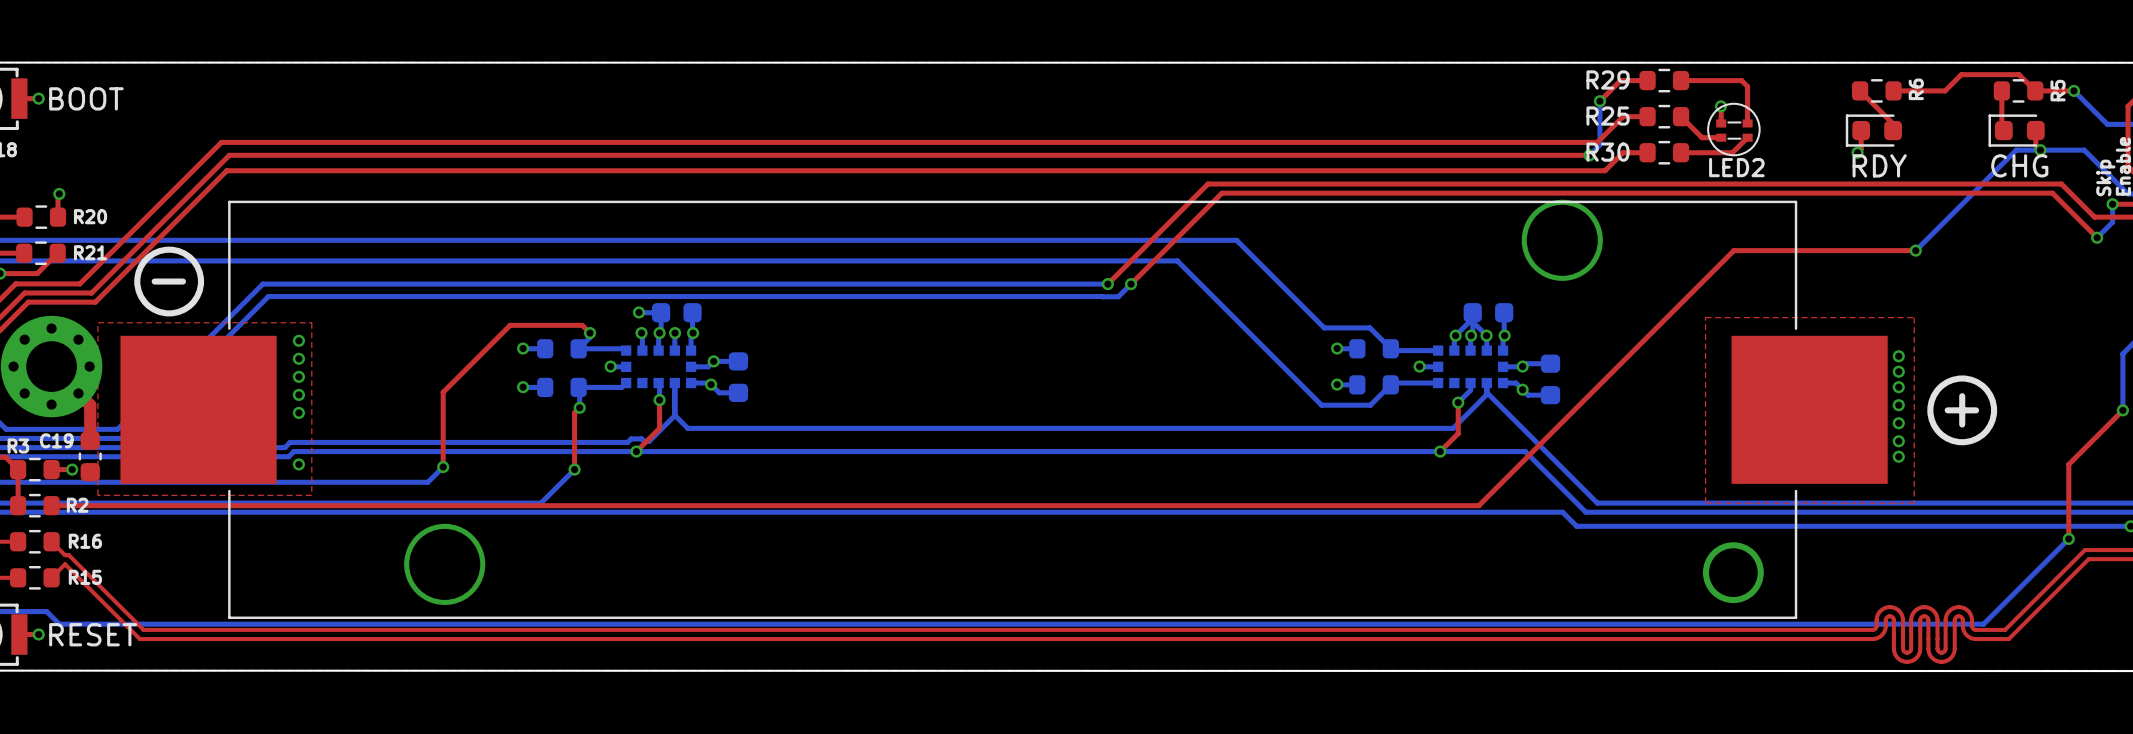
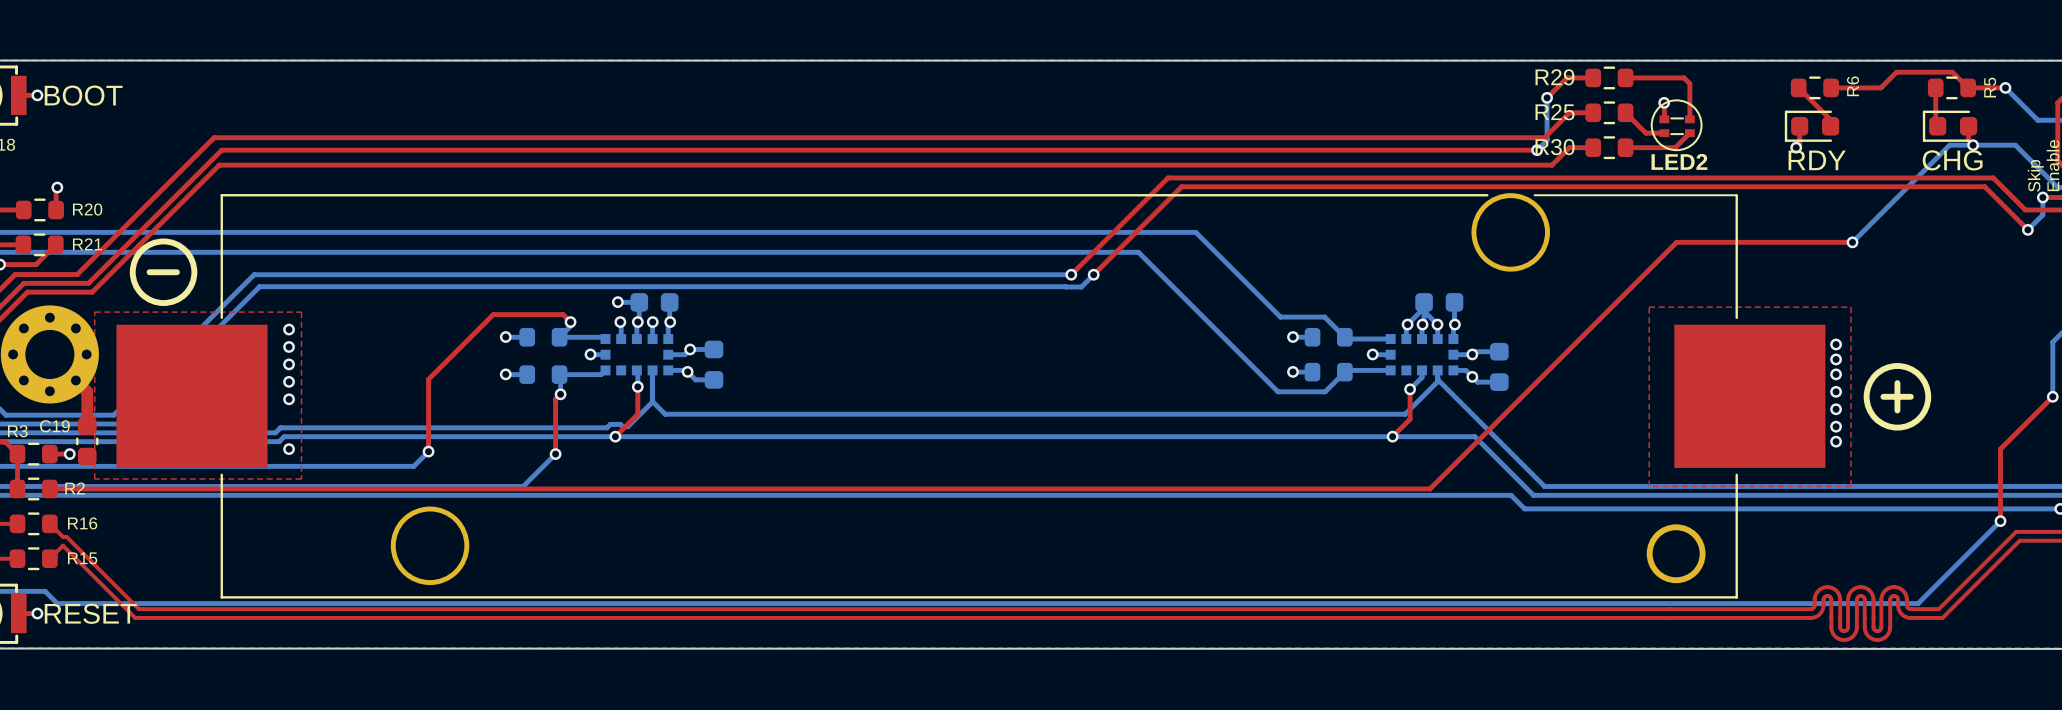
part footprint: [120, 199, 1888, 619] -> [116, 193, 1826, 599]

